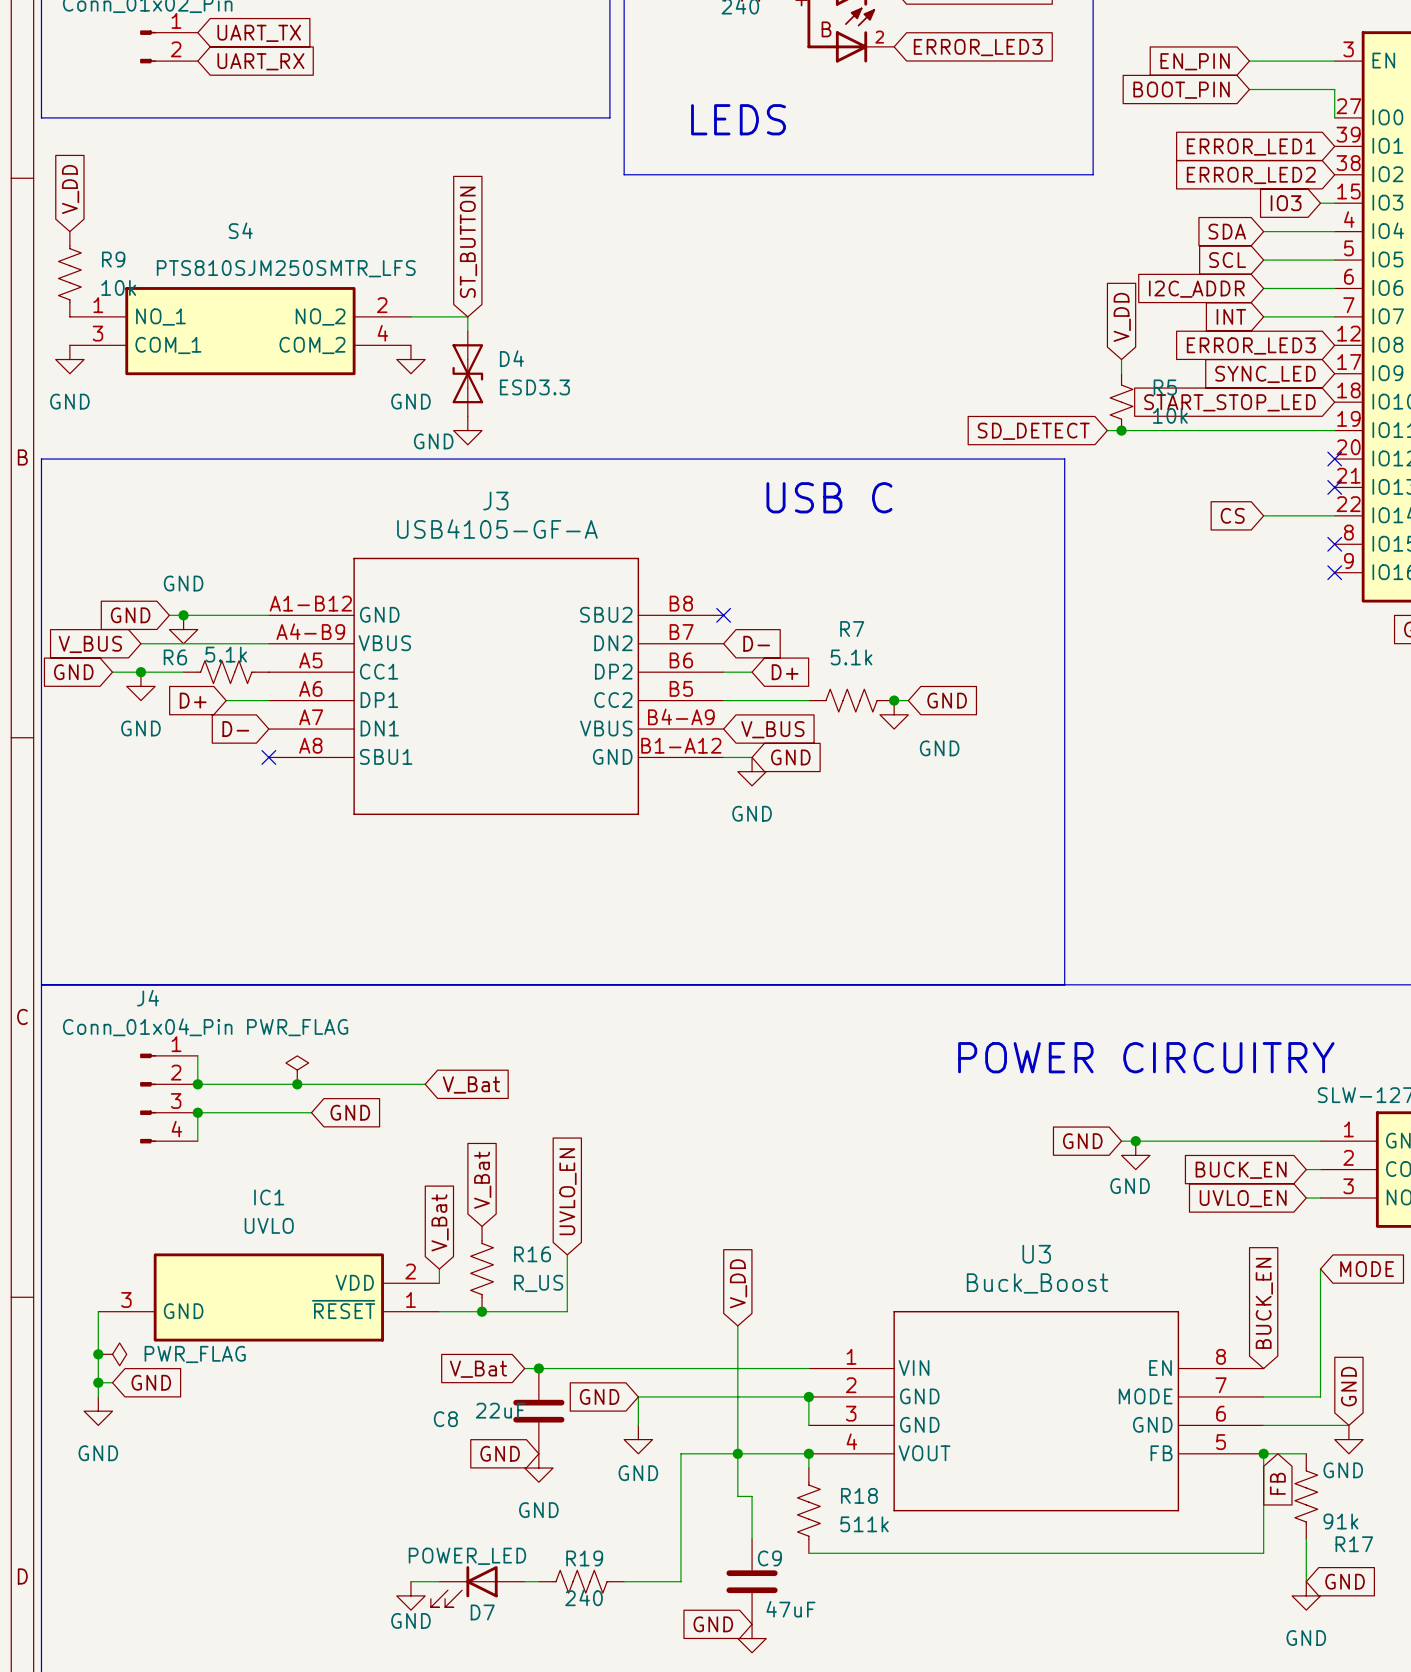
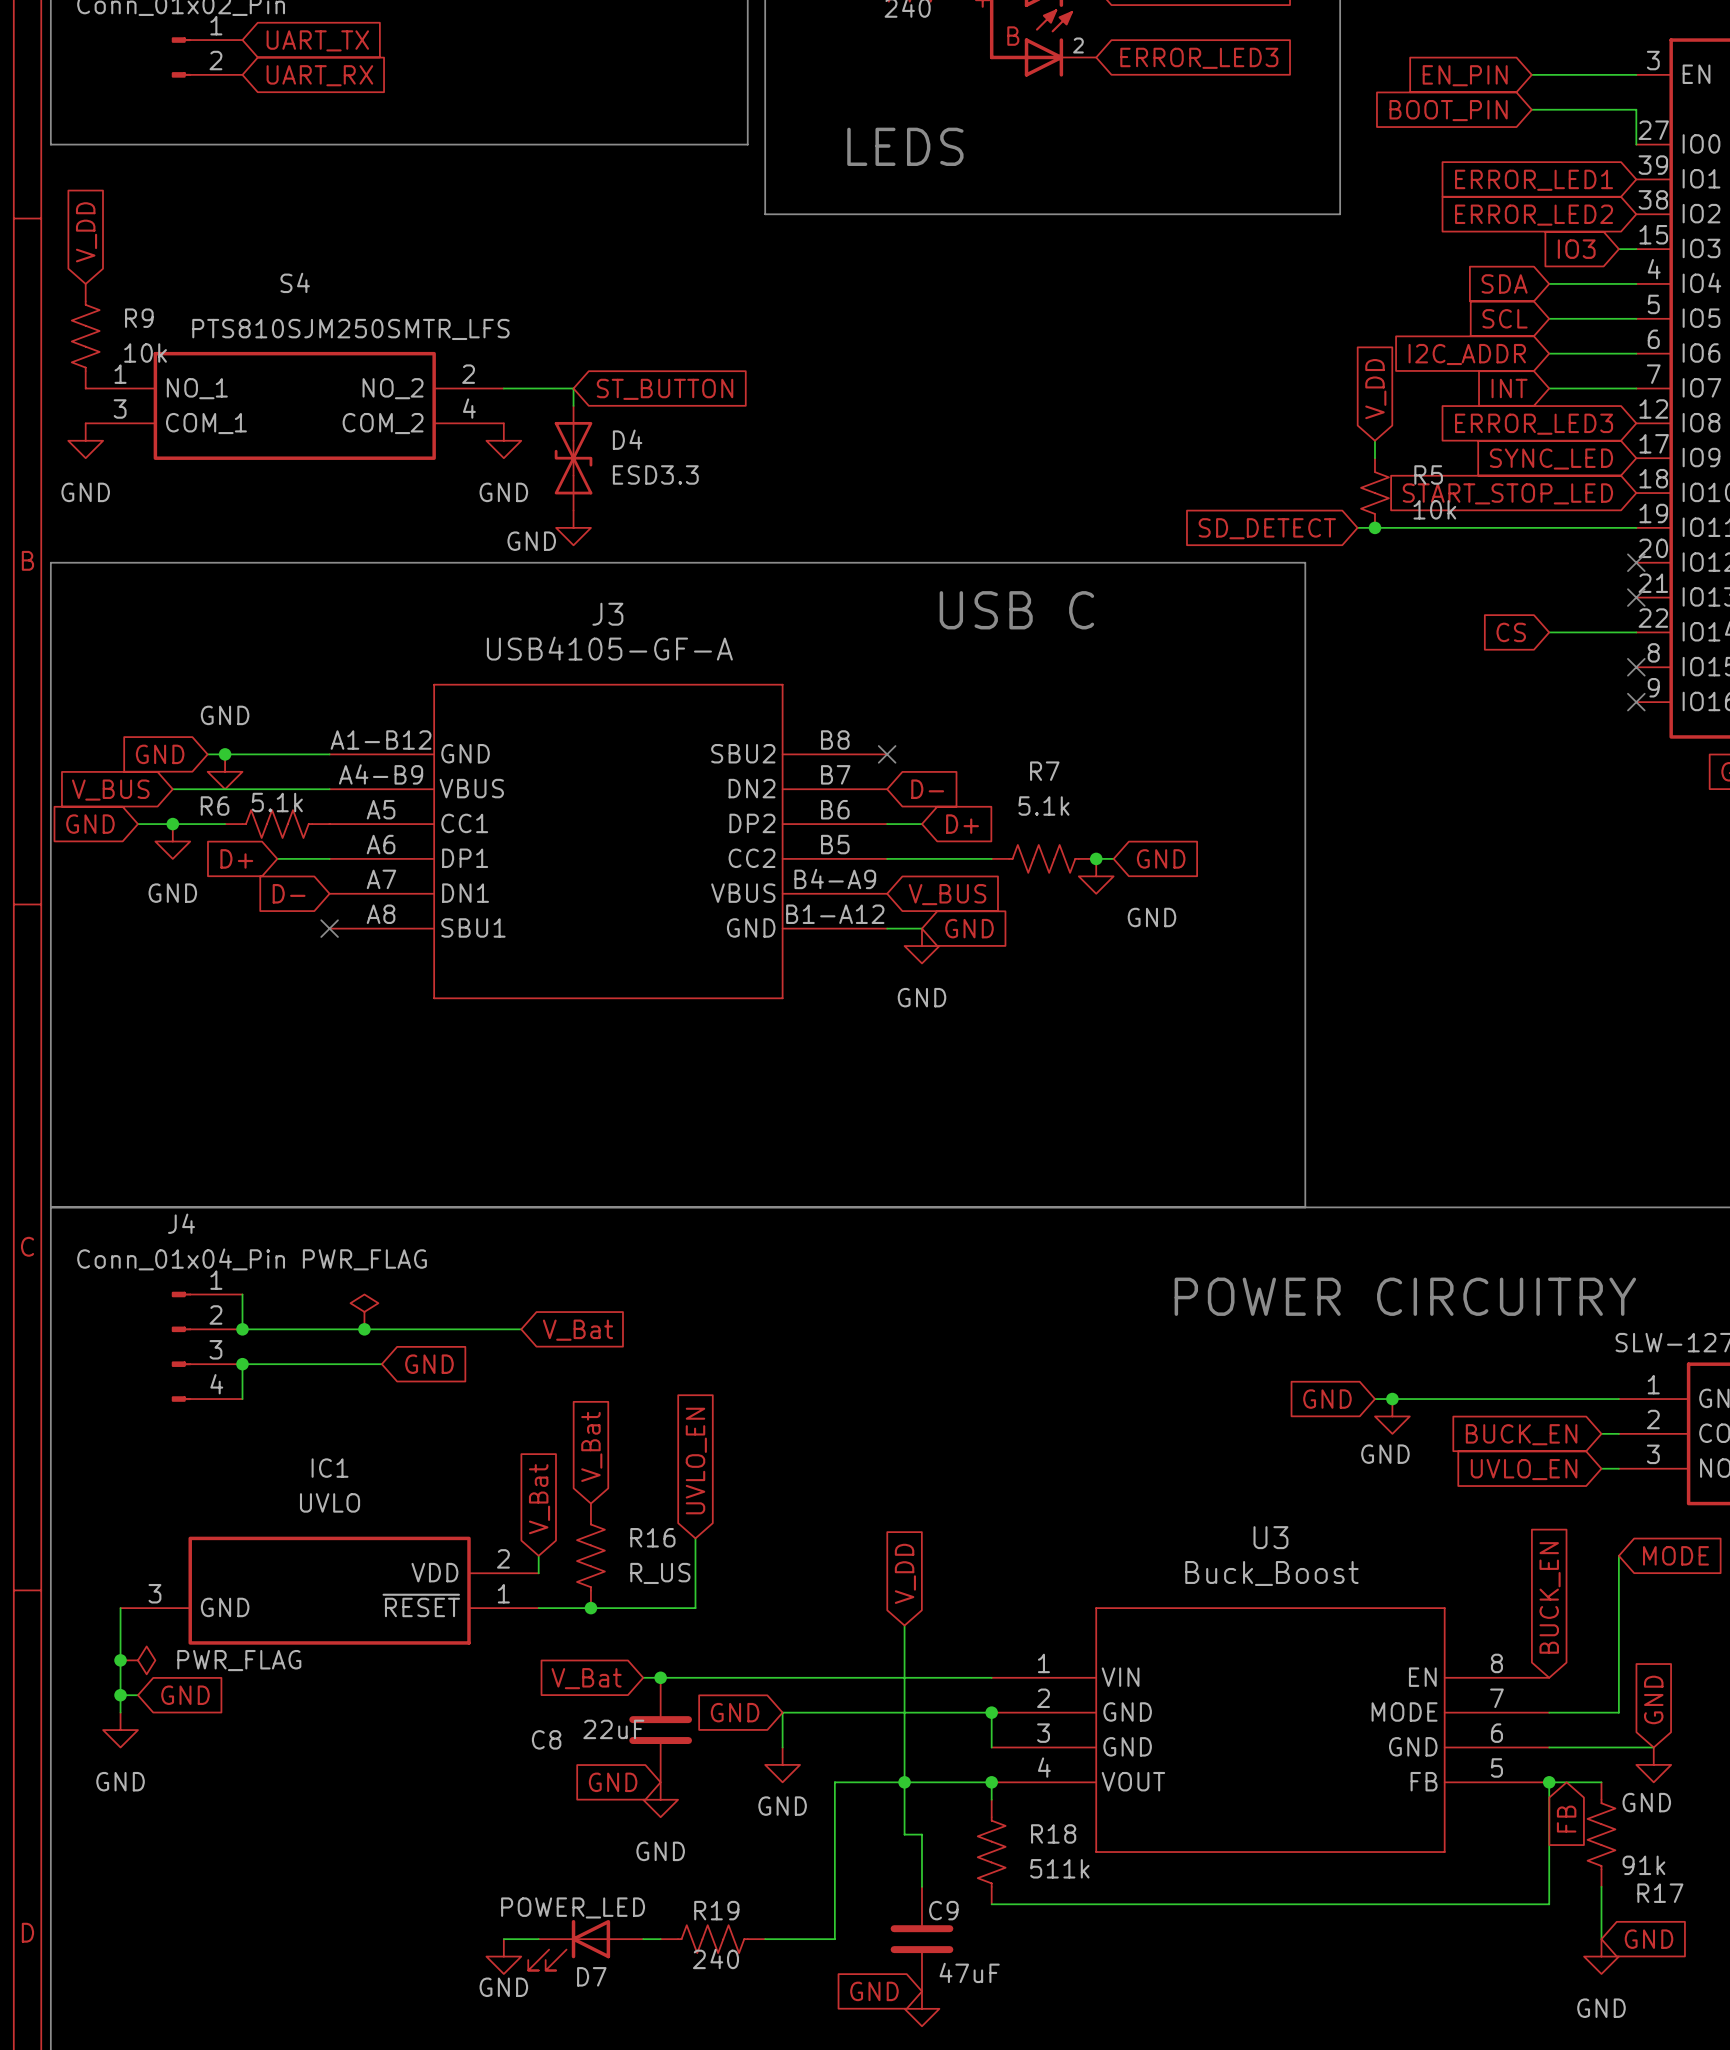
global label rotation: 0° (468, 242) -> 90° clockwise (665, 389)

